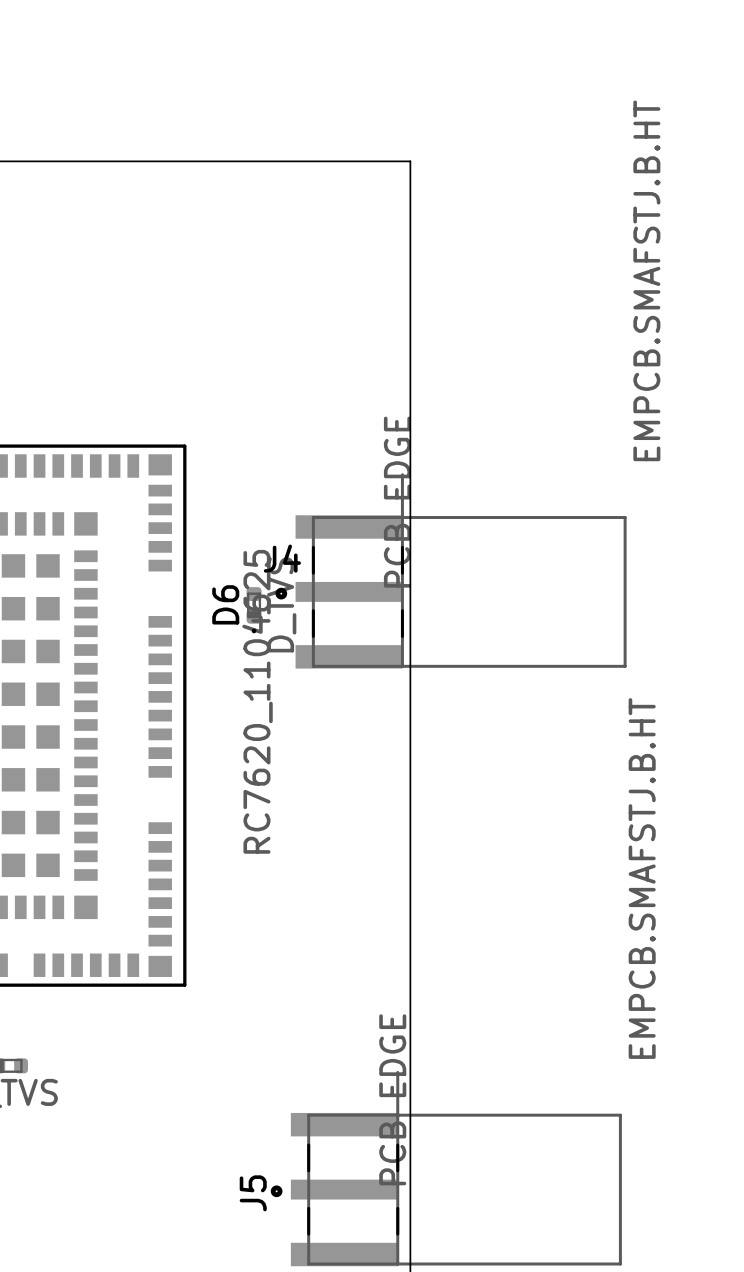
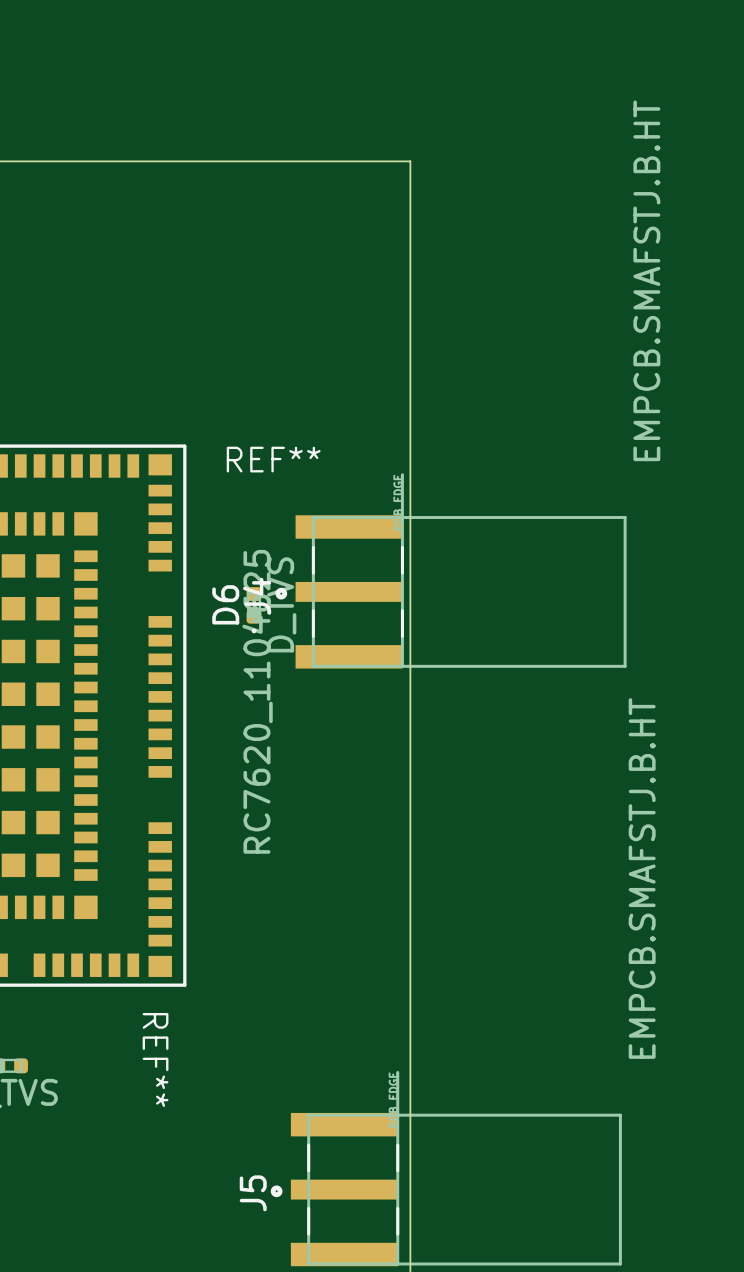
REF**: none -> (273, 459)
J4 footprint: [275, 473, 627, 669] -> [275, 473, 627, 669]
REF**: none -> (155, 1059)
J5 footprint: [270, 1070, 622, 1267] -> [270, 1070, 622, 1267]

